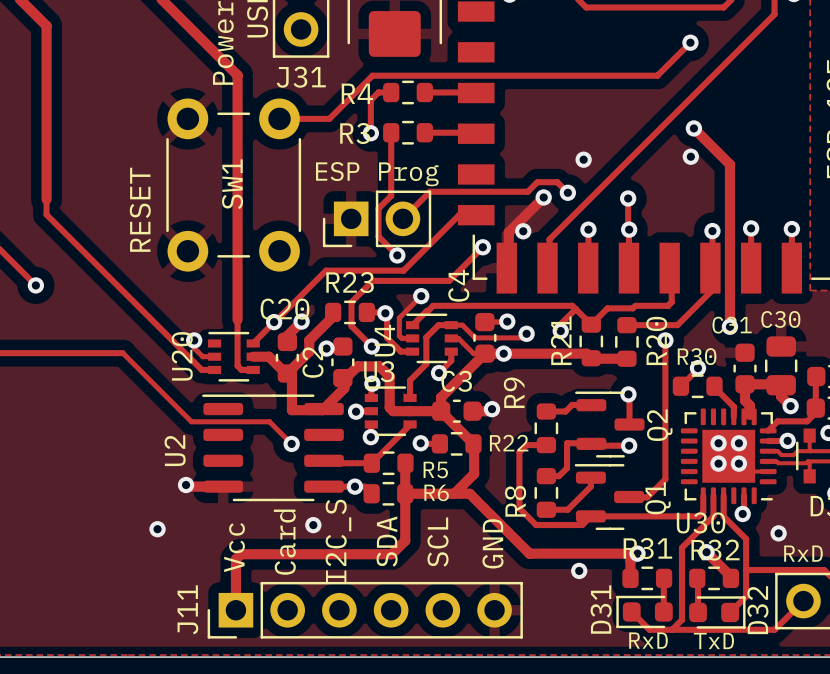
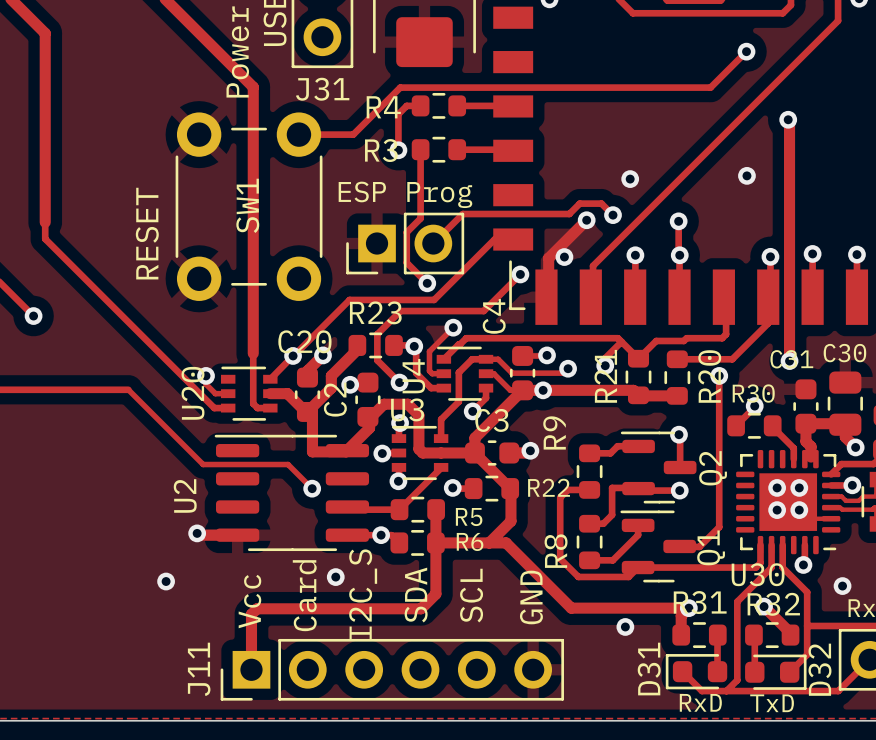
track: (693, 128) (729, 164) -> (788, 119) (789, 184)
via position: (693, 128) -> (788, 119)

